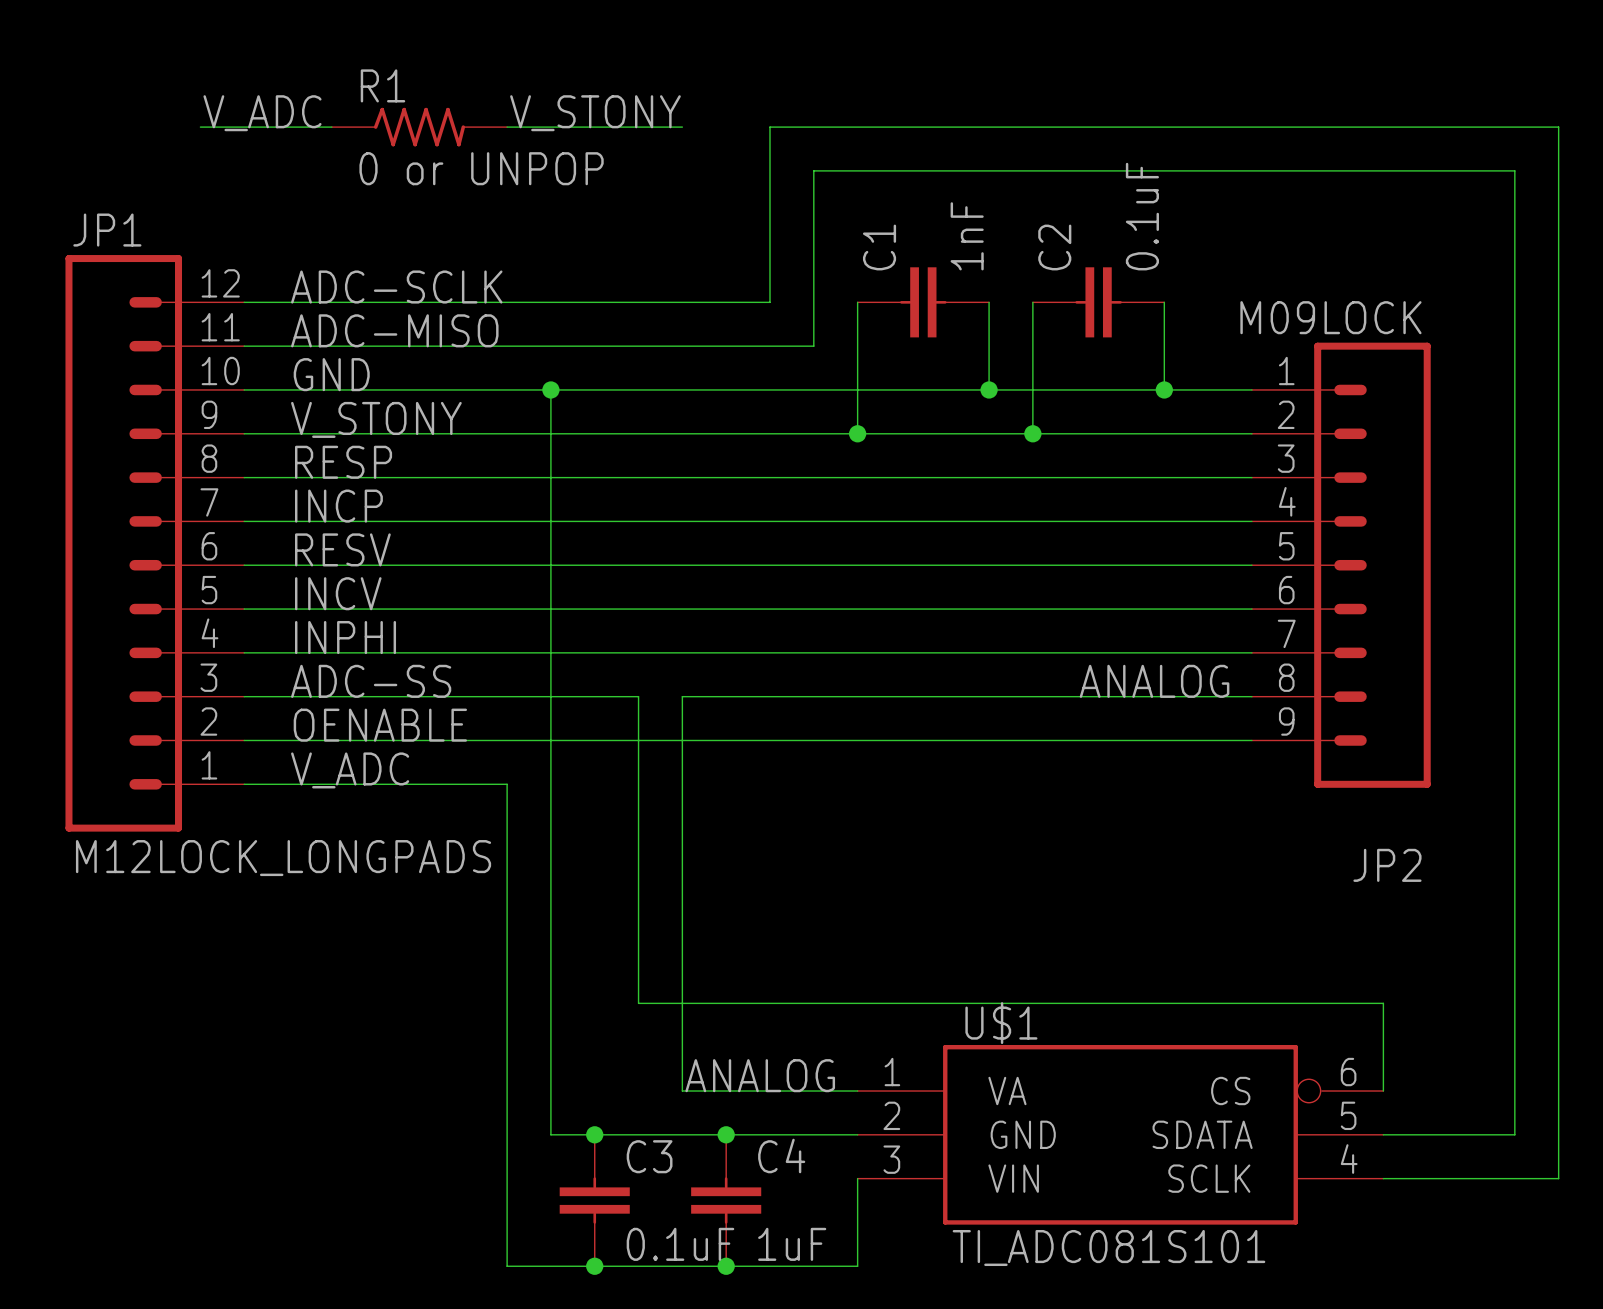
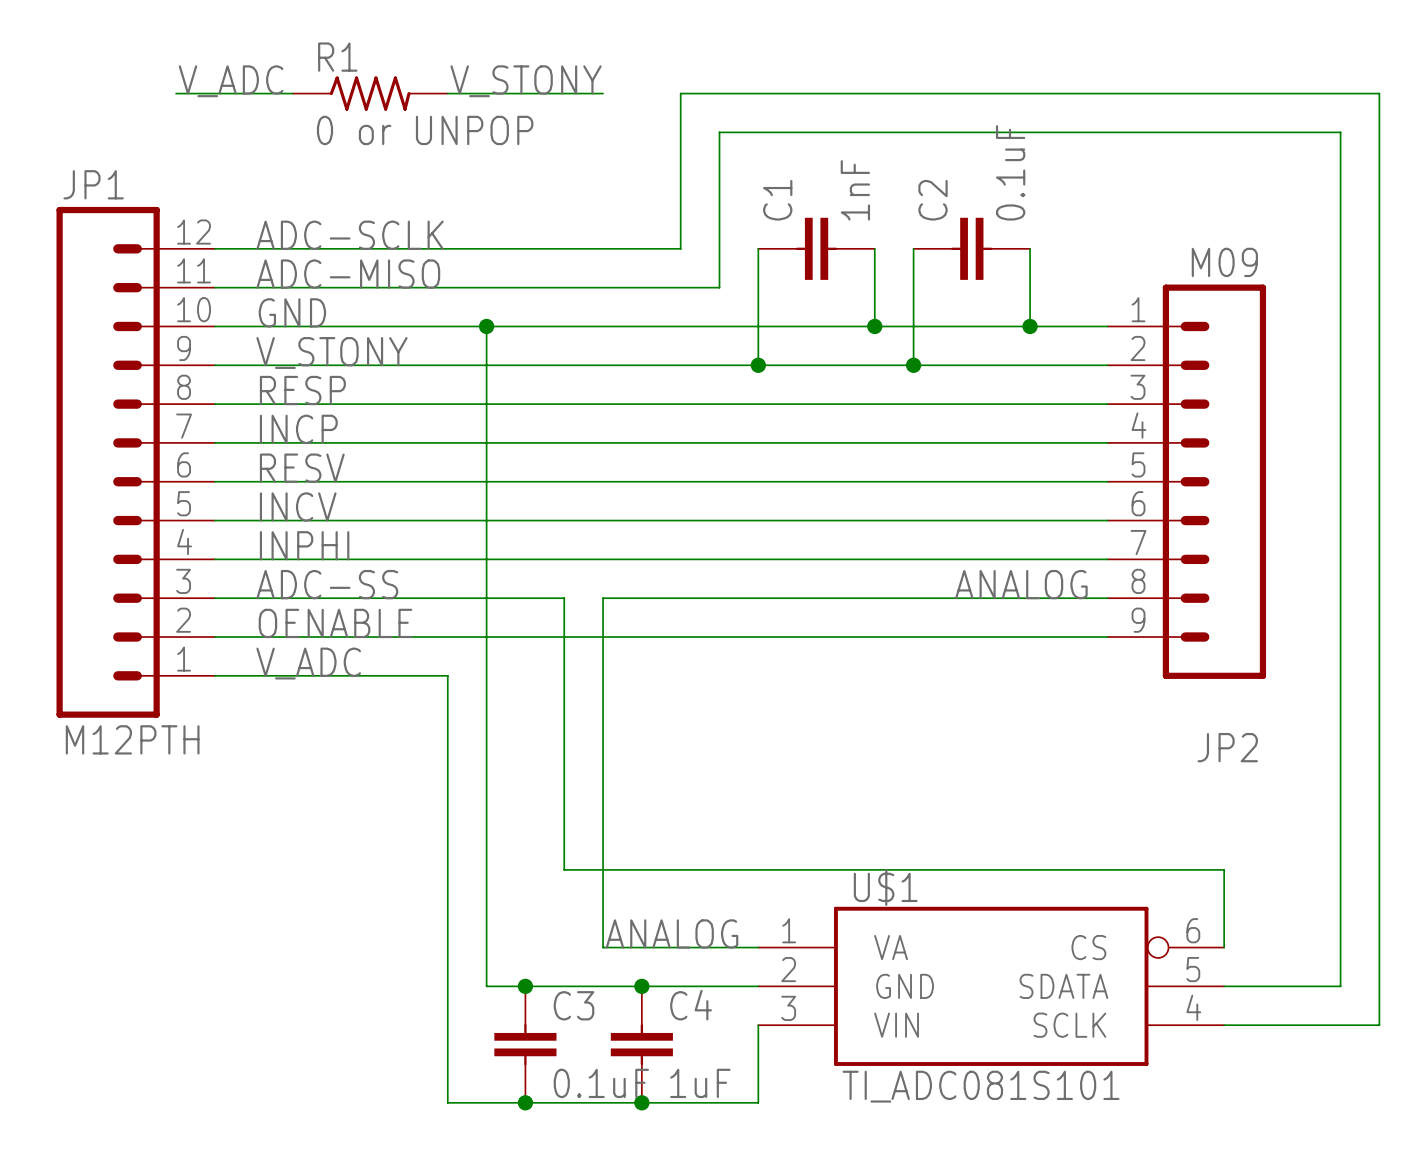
JP2 value: M09LOCK (1330, 317) -> M09 (1224, 262)
JP1 value: M12LOCK_LONGPADS (283, 858) -> M12PTH (132, 739)

